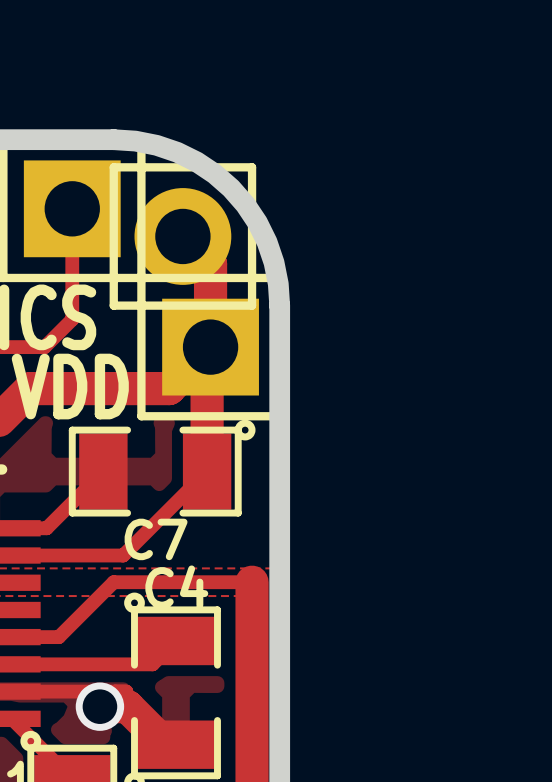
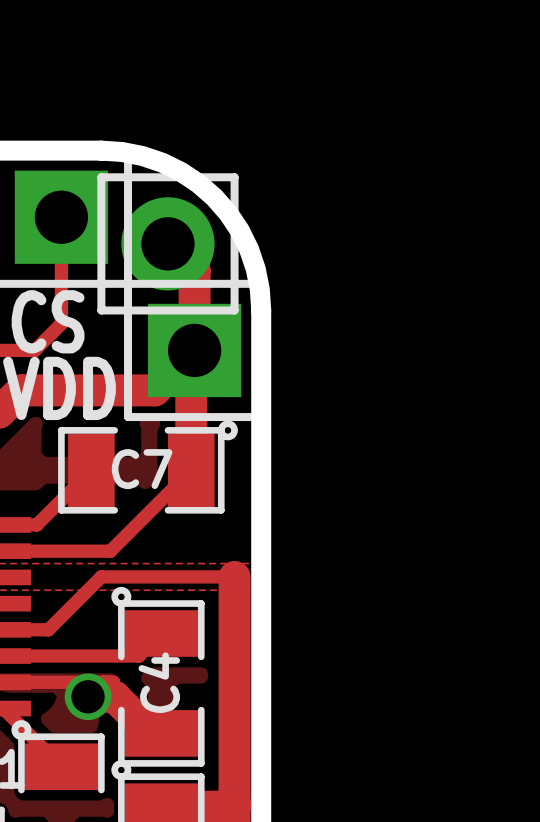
C7 name position: C7 (156, 539) -> C7 (142, 469)
C4 name rotation: 0° (176, 587) -> 90° counterclockwise (159, 682)
C4 name position: C4 (176, 587) -> C4 (159, 682)

